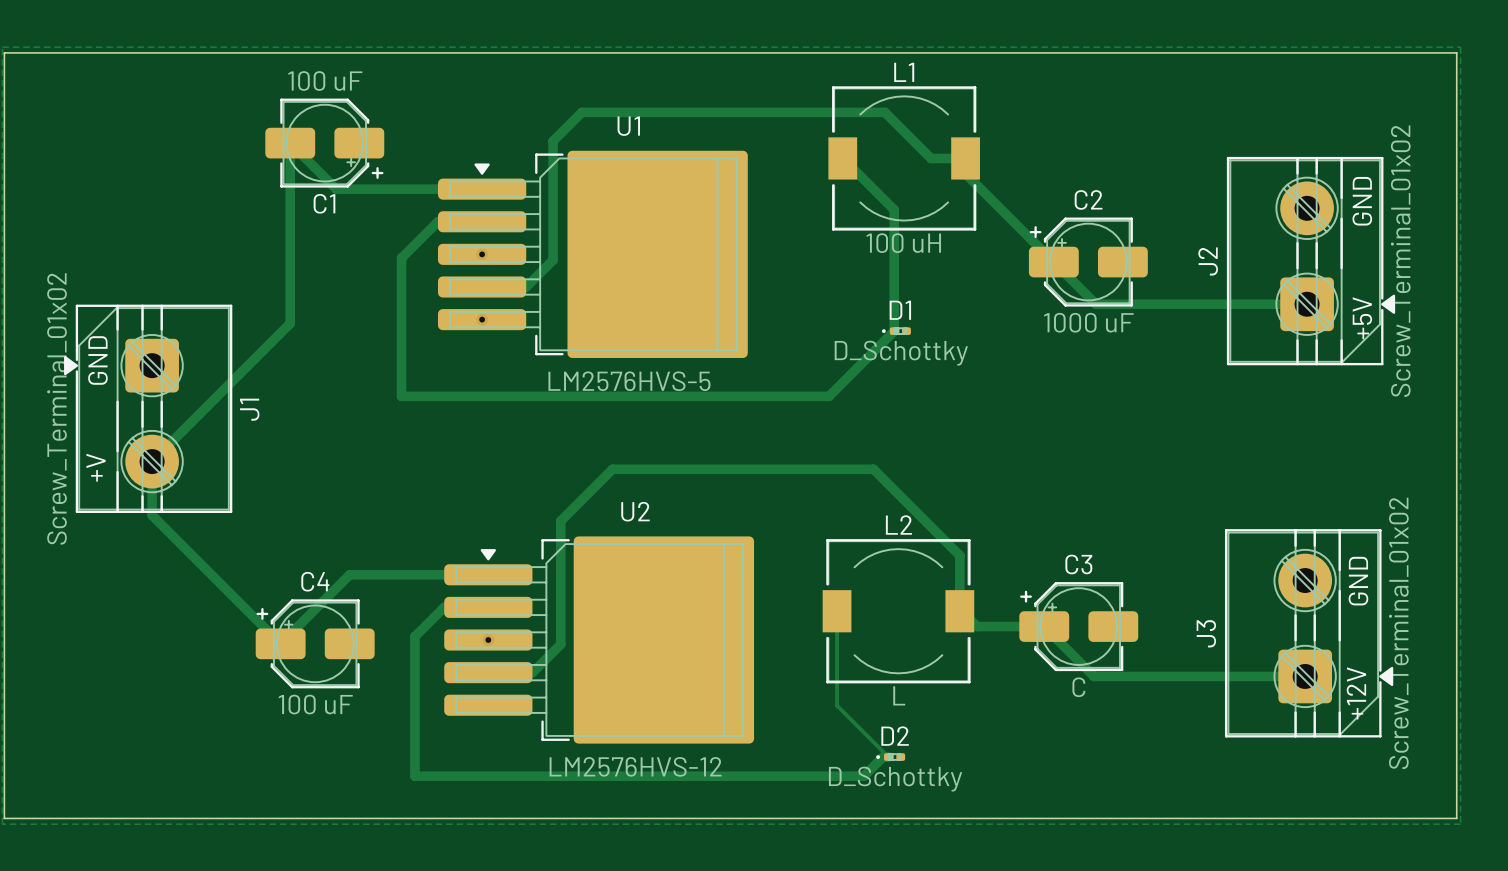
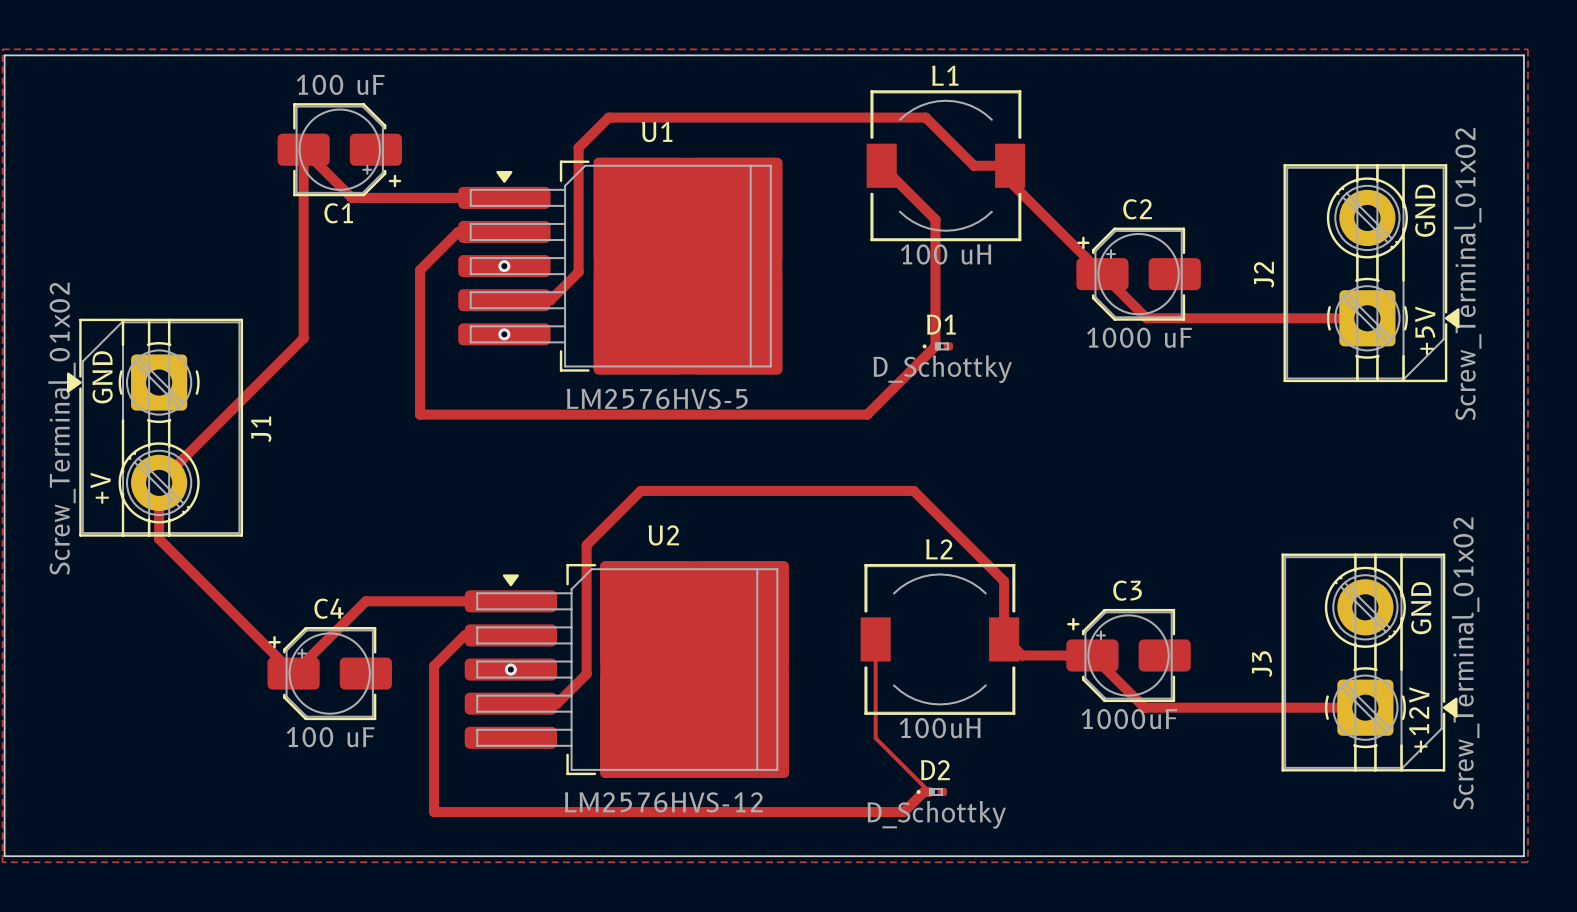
U1 footprint: [437, 150, 748, 358] -> [458, 157, 783, 375]
J2 footprint: [1226, 156, 1396, 366] -> [1283, 164, 1460, 383]
J1 footprint: [64, 304, 233, 514] -> [67, 318, 244, 537]
J3 footprint: [1224, 529, 1394, 738] -> [1281, 553, 1458, 772]
U2 footprint: [444, 536, 755, 744] -> [464, 561, 789, 778]
C3 value: C (1078, 687) -> 1000uF (1129, 719)
L2 value: L (899, 695) -> 100uH (940, 728)

